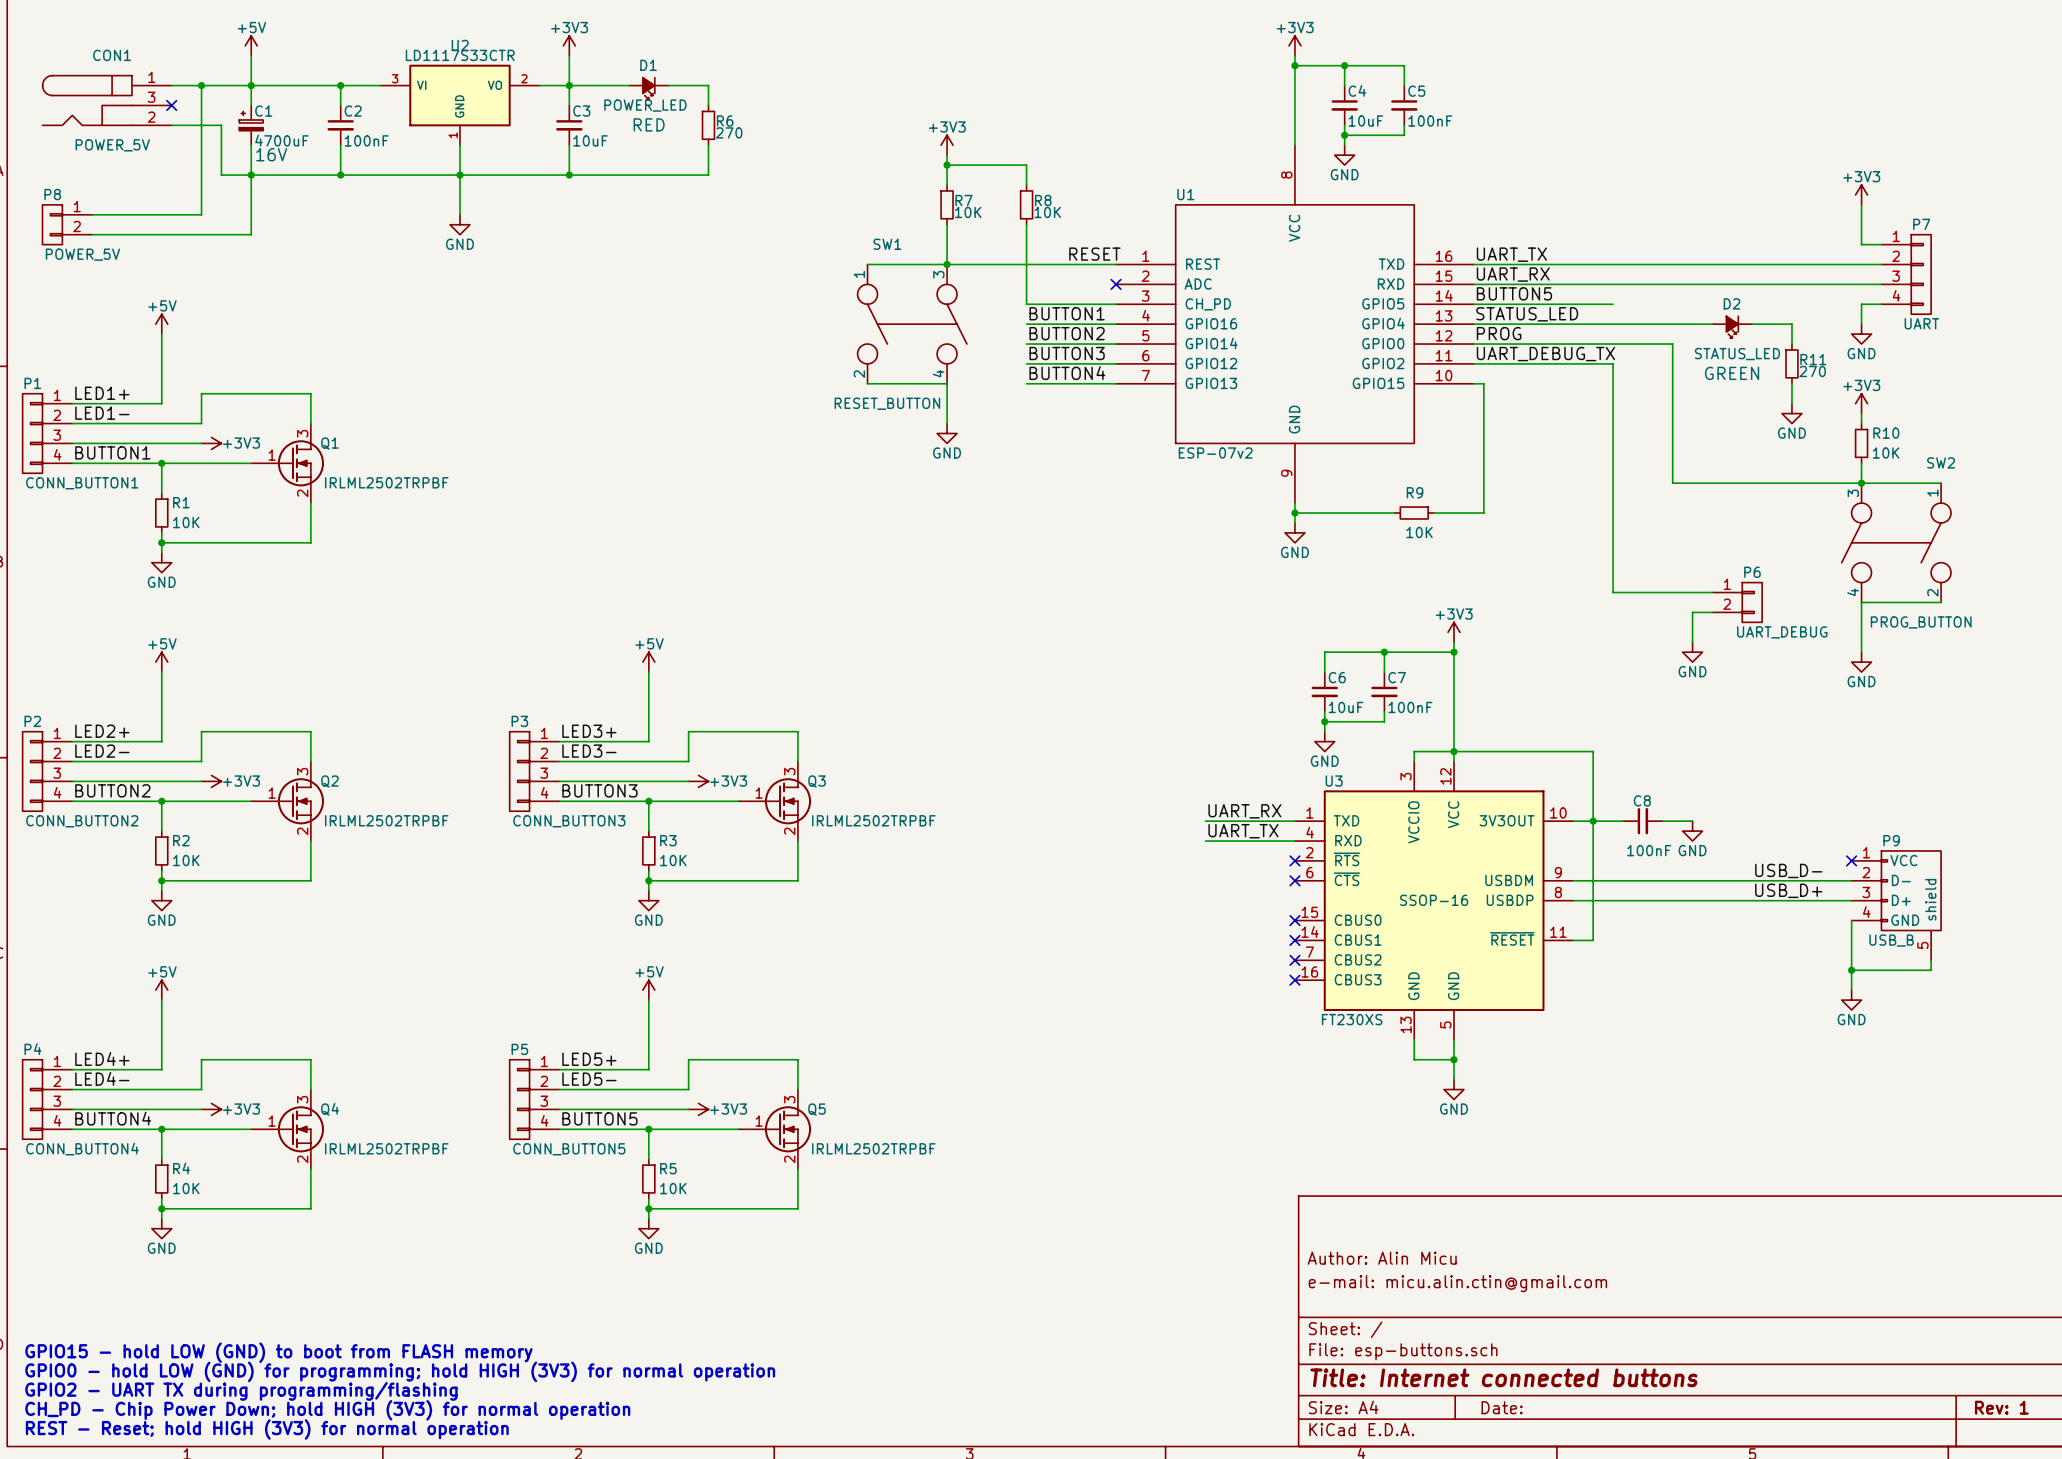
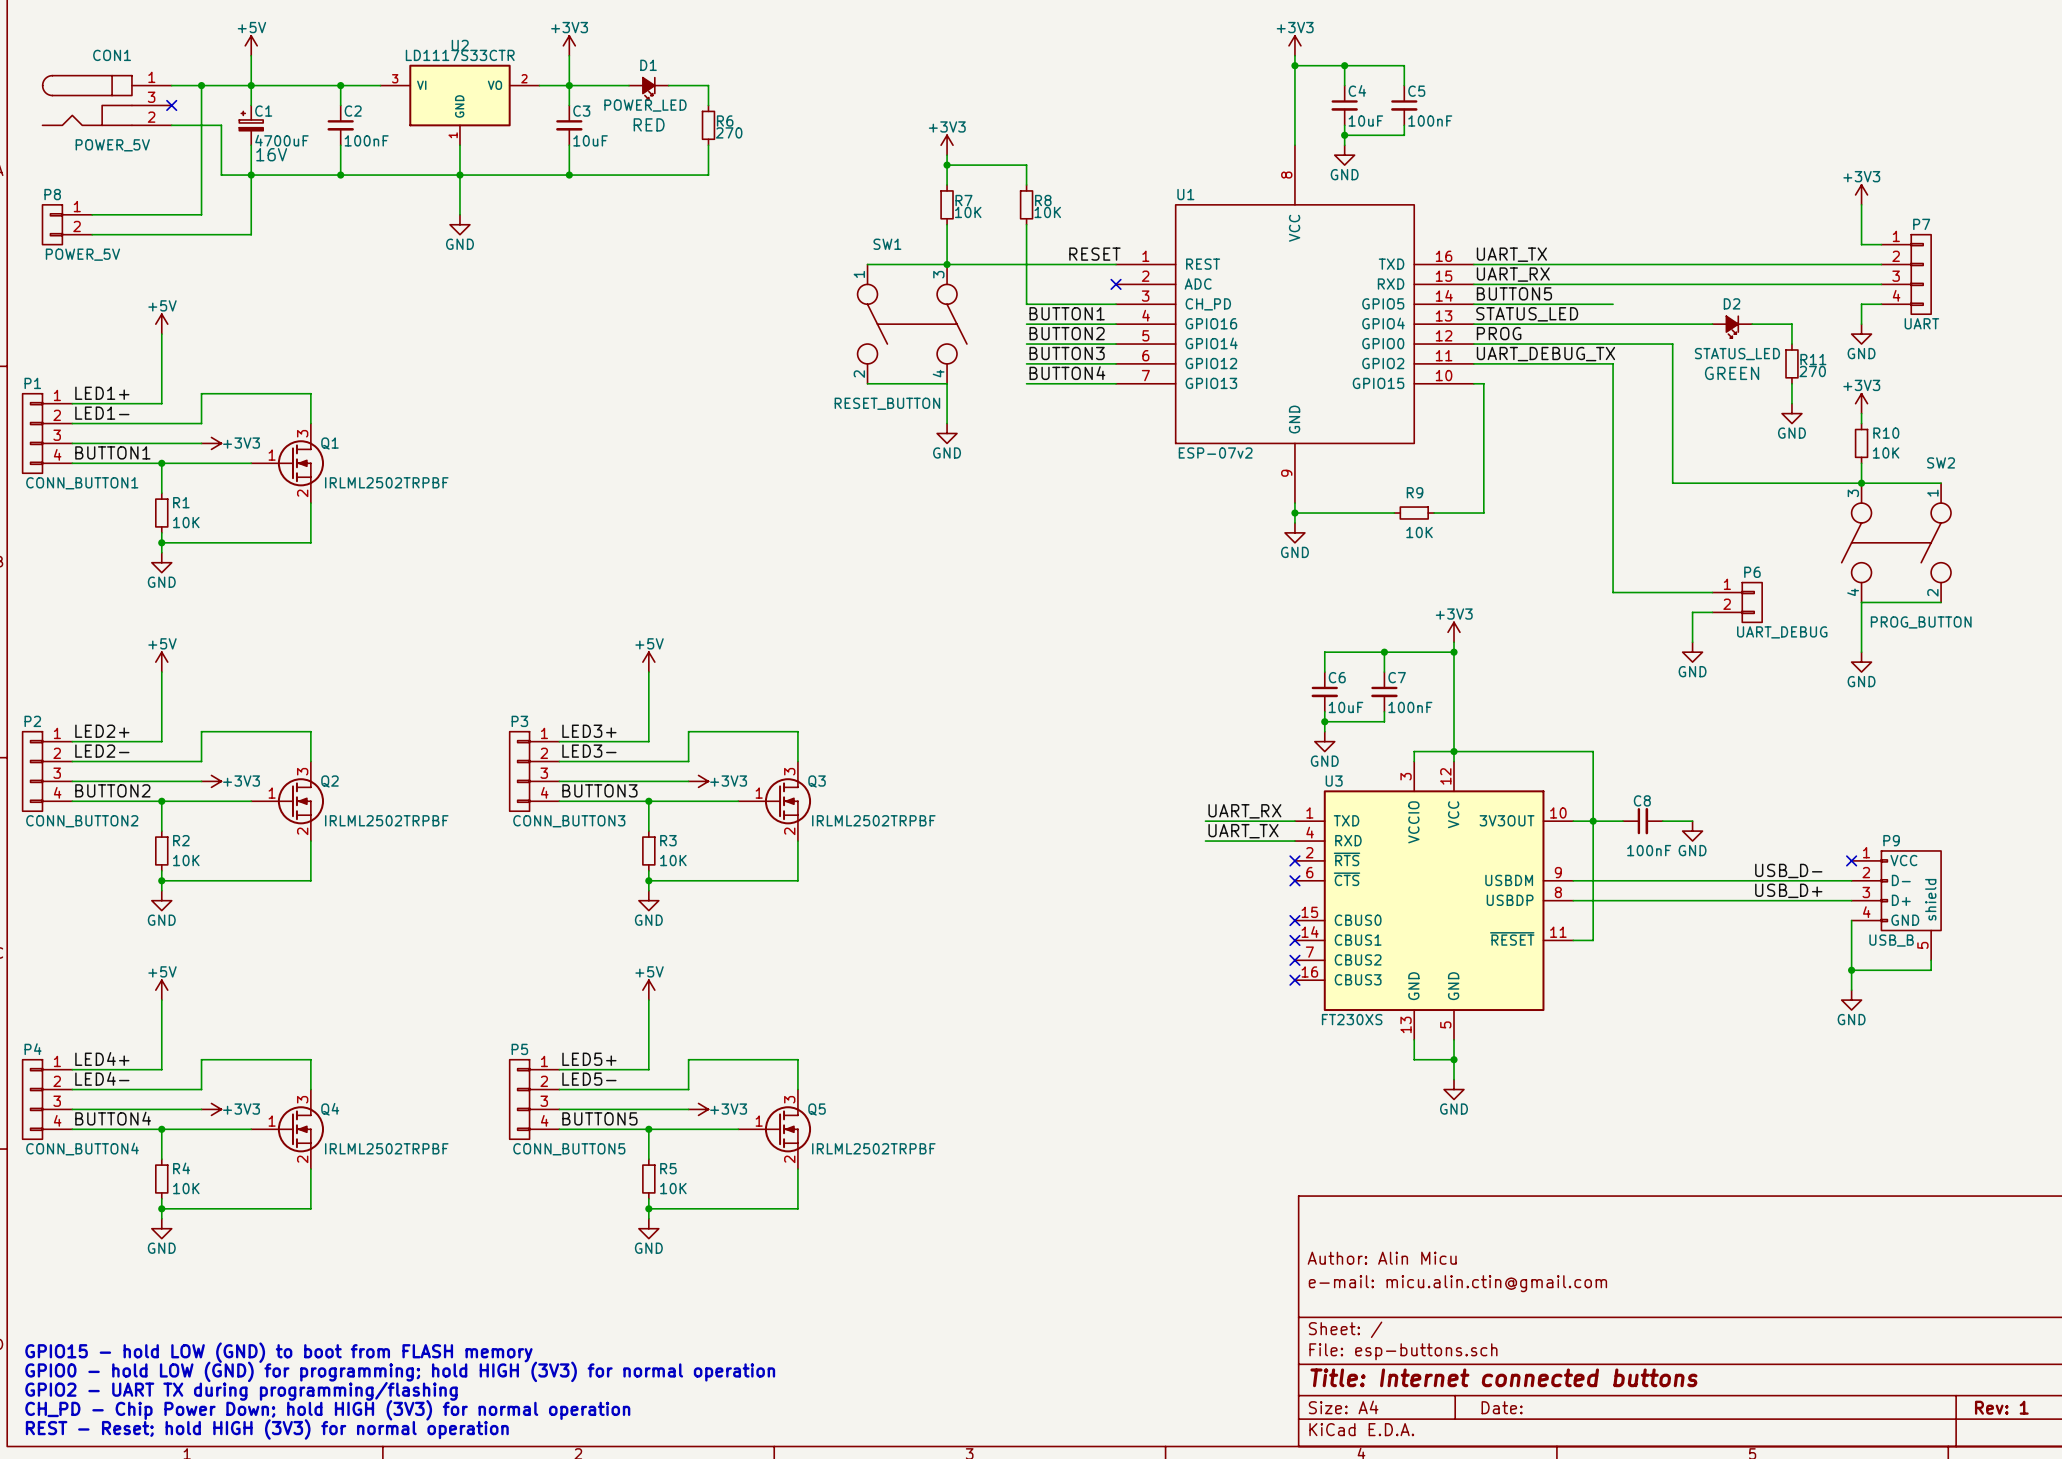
U3 text: SSOP-16 (1434, 900) -> none

